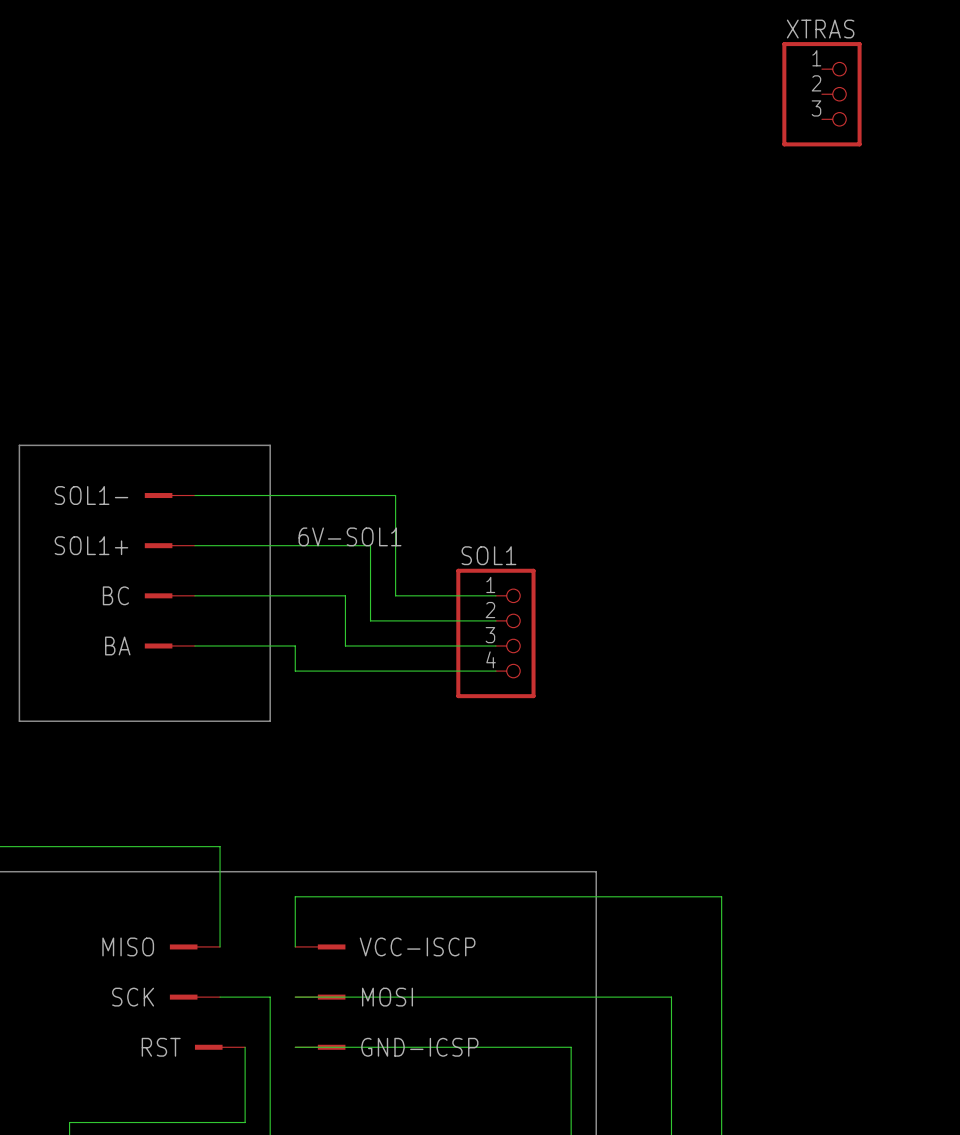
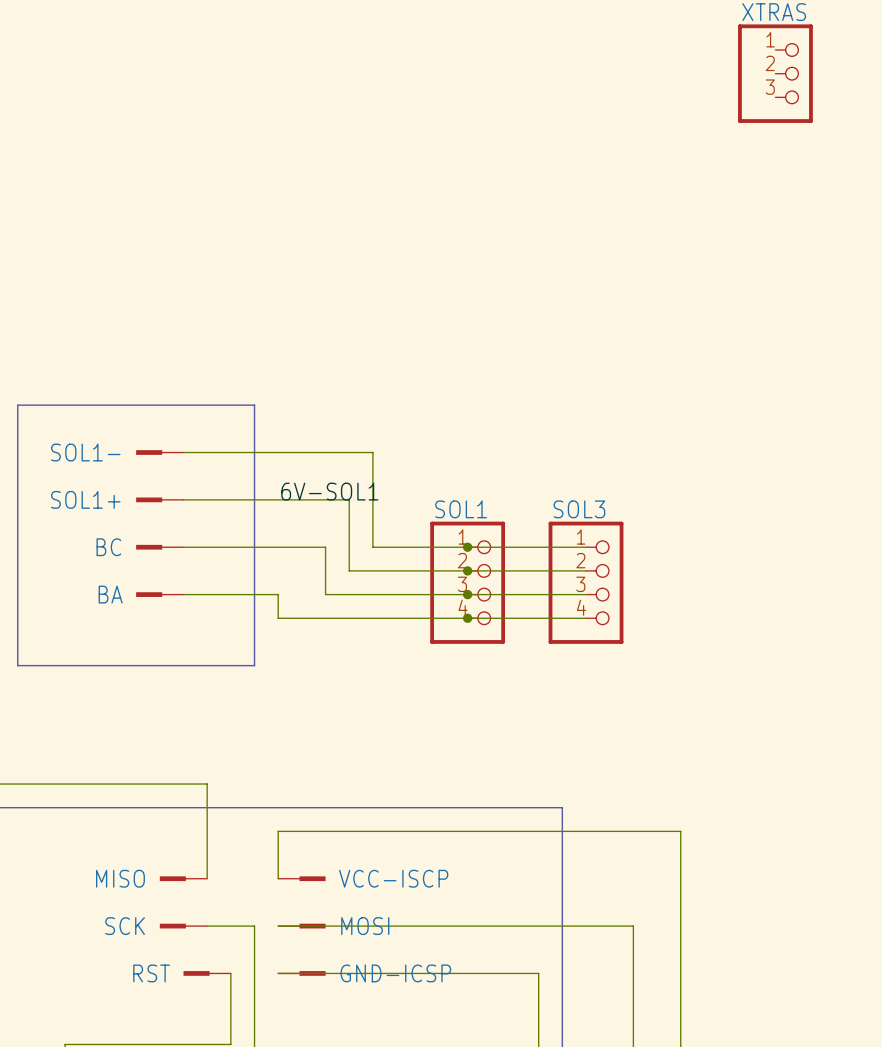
wire: none -> (467, 547) (586, 547)
junction: none -> (467, 547)
wire: none -> (467, 570) (586, 570)
junction: none -> (467, 570)
SOL3: none -> (586, 582)
wire: none -> (467, 594) (586, 594)
junction: none -> (467, 594)
wire: none -> (467, 618) (586, 618)
junction: none -> (467, 618)

